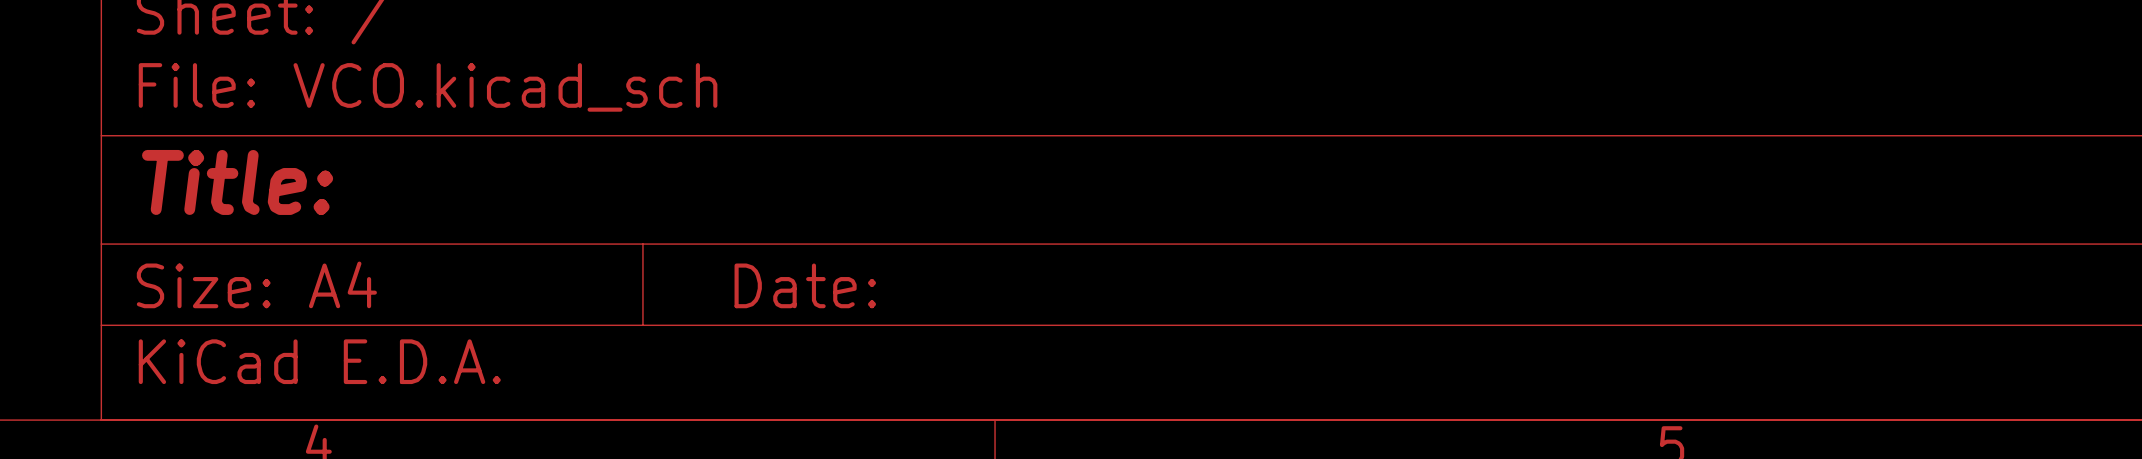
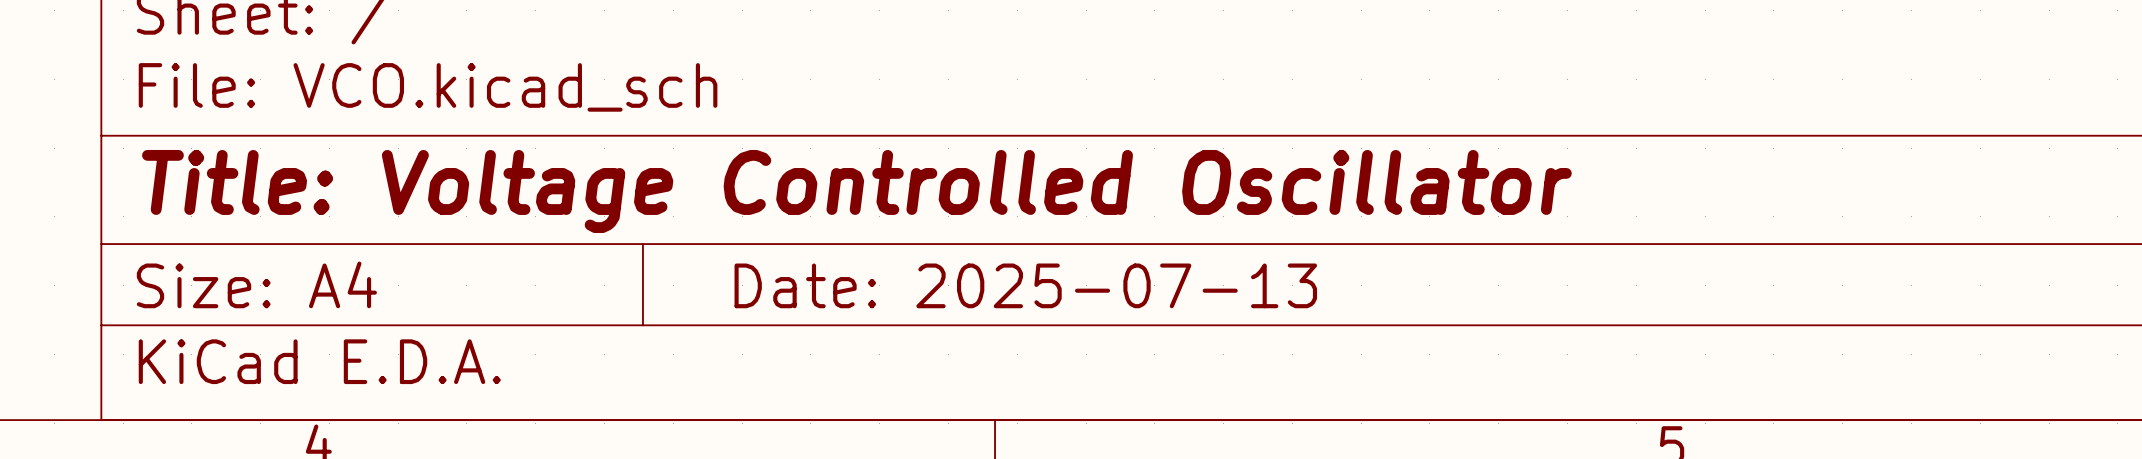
title block: Title: (237, 182) -> Title: Voltage Controlled Oscillator (856, 191)
title block: Date: (805, 285) -> Date: 2025-07-13 (1025, 285)

